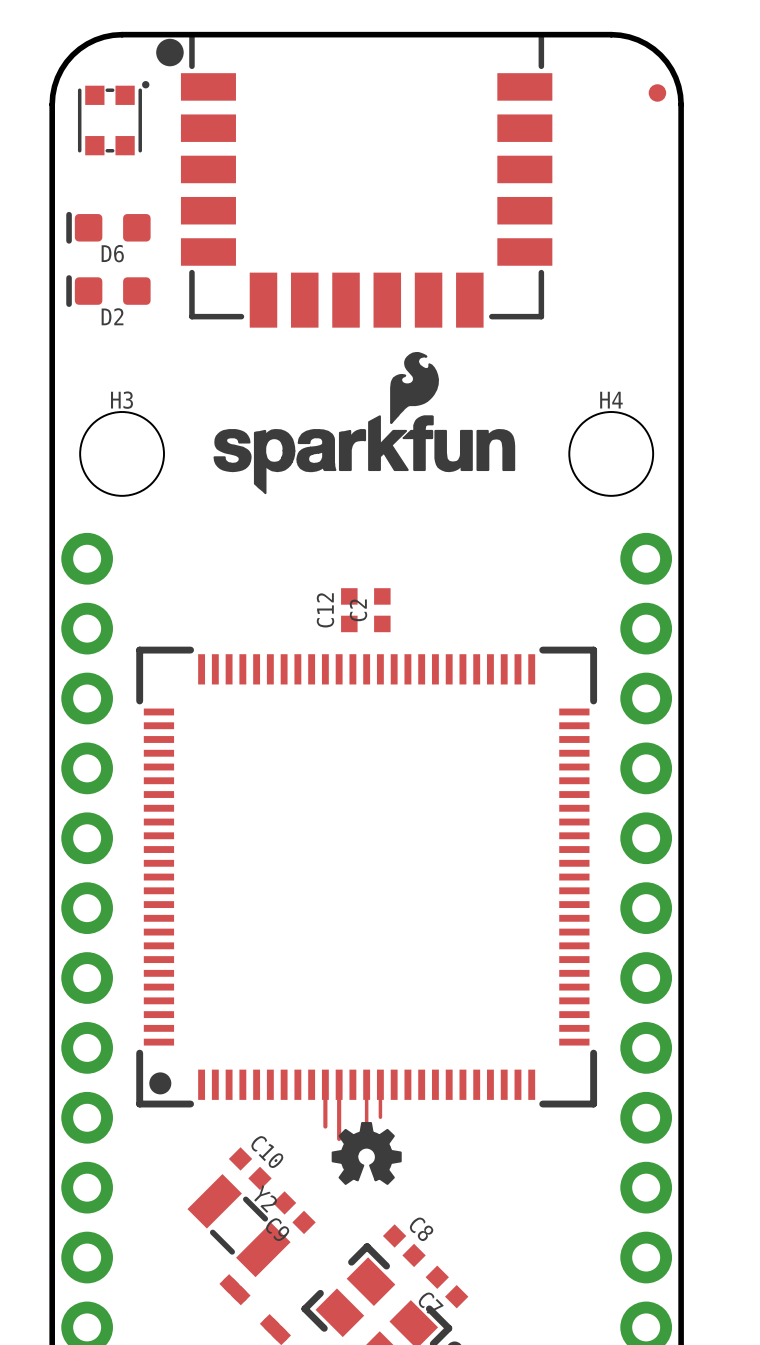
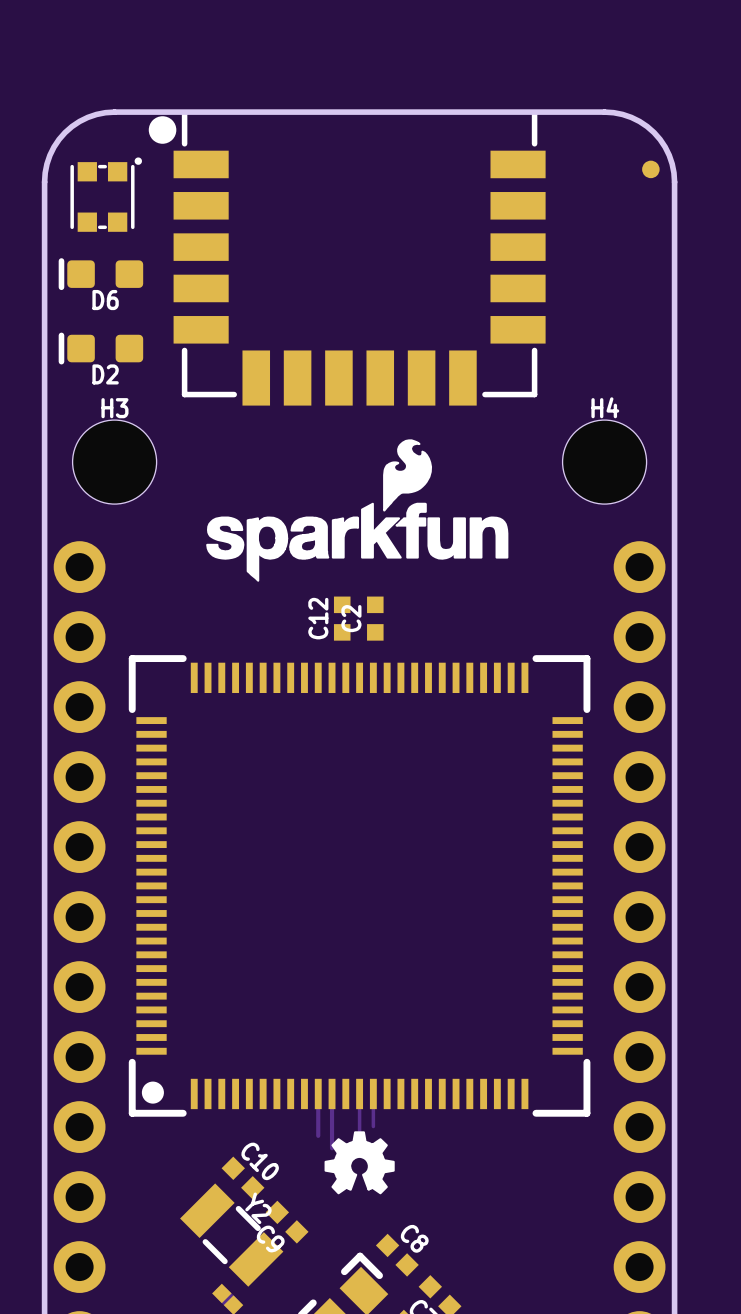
part position: (657, 92) -> (650, 169)
part position: (113, 118) -> (106, 194)
board edge: (52, 174) (52, 95) (61, 69) (72, 55) (87, 44) (103, 37) (122, 34) (611, 34) (629, 37) (646, 44) (660, 55) (675, 77) (681, 104) (681, 174) -> (44, 182) (49, 155) (65, 132) (87, 117) (114, 112) (613, 112) (631, 117) (654, 132) (669, 155) (674, 182)
part position: (354, 180) -> (347, 258)
D6 position: (108, 227) -> (100, 274)
D2 position: (108, 291) -> (100, 348)
drawing position: (364, 423) -> (357, 510)

